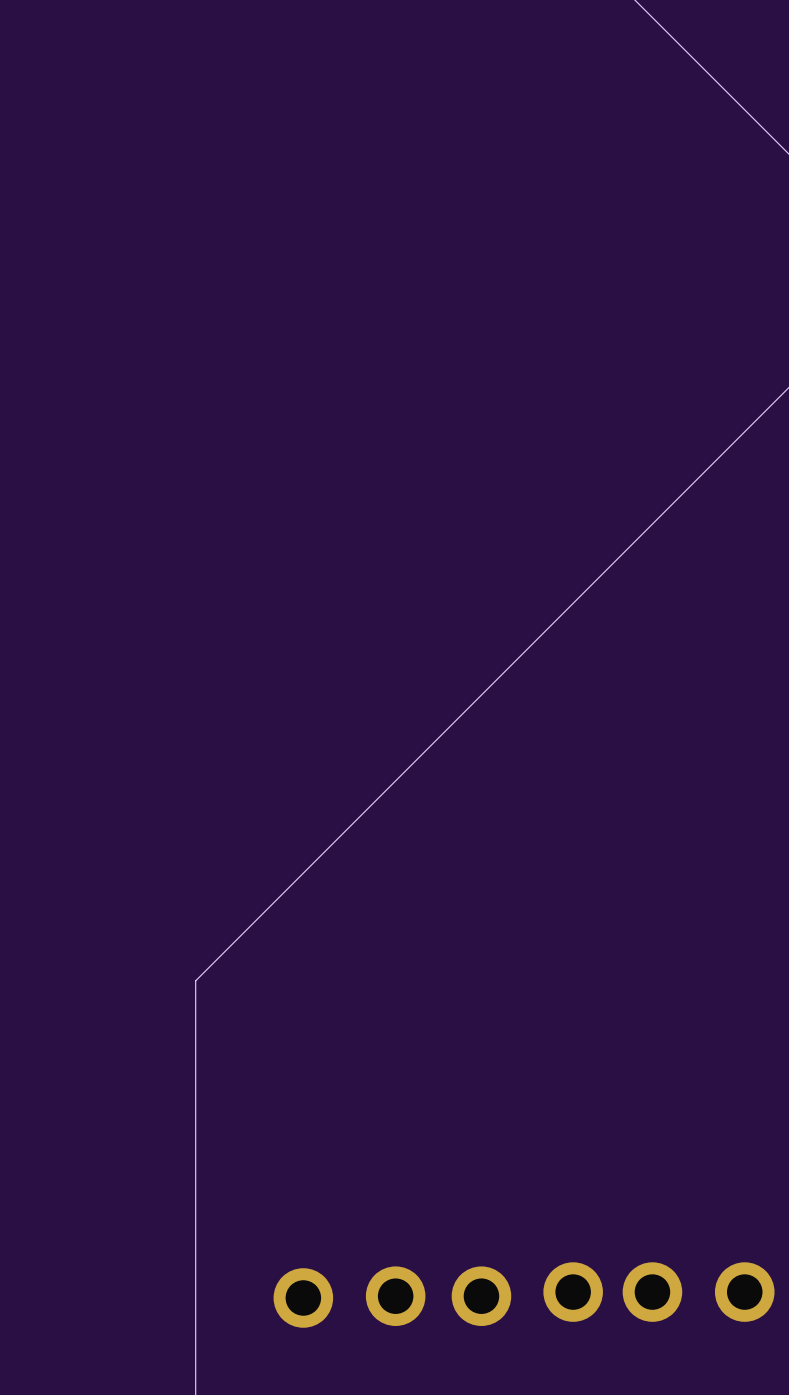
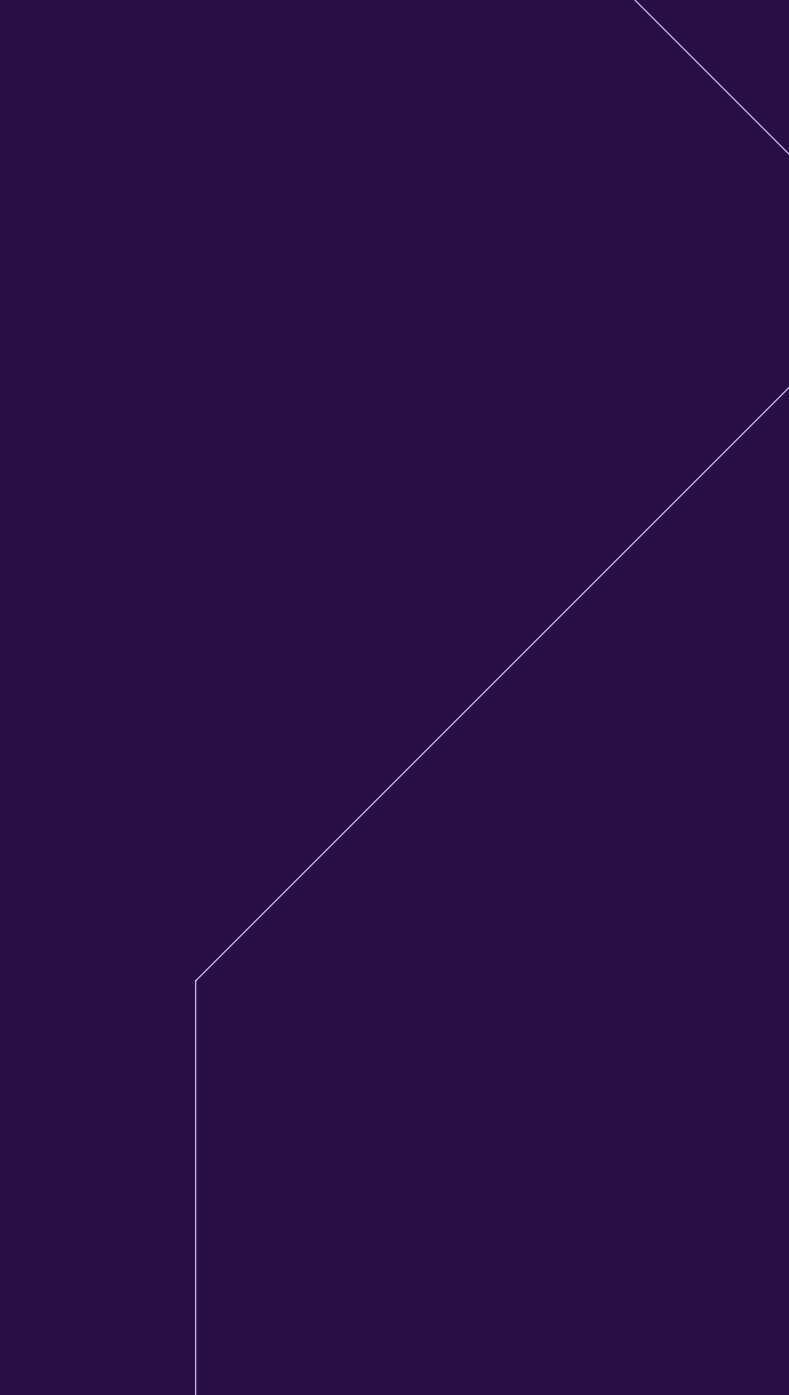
via: (573, 1292) -> none
via: (652, 1292) -> none
via: (744, 1292) -> none
via: (395, 1296) -> none
via: (481, 1296) -> none
via: (303, 1297) -> none

